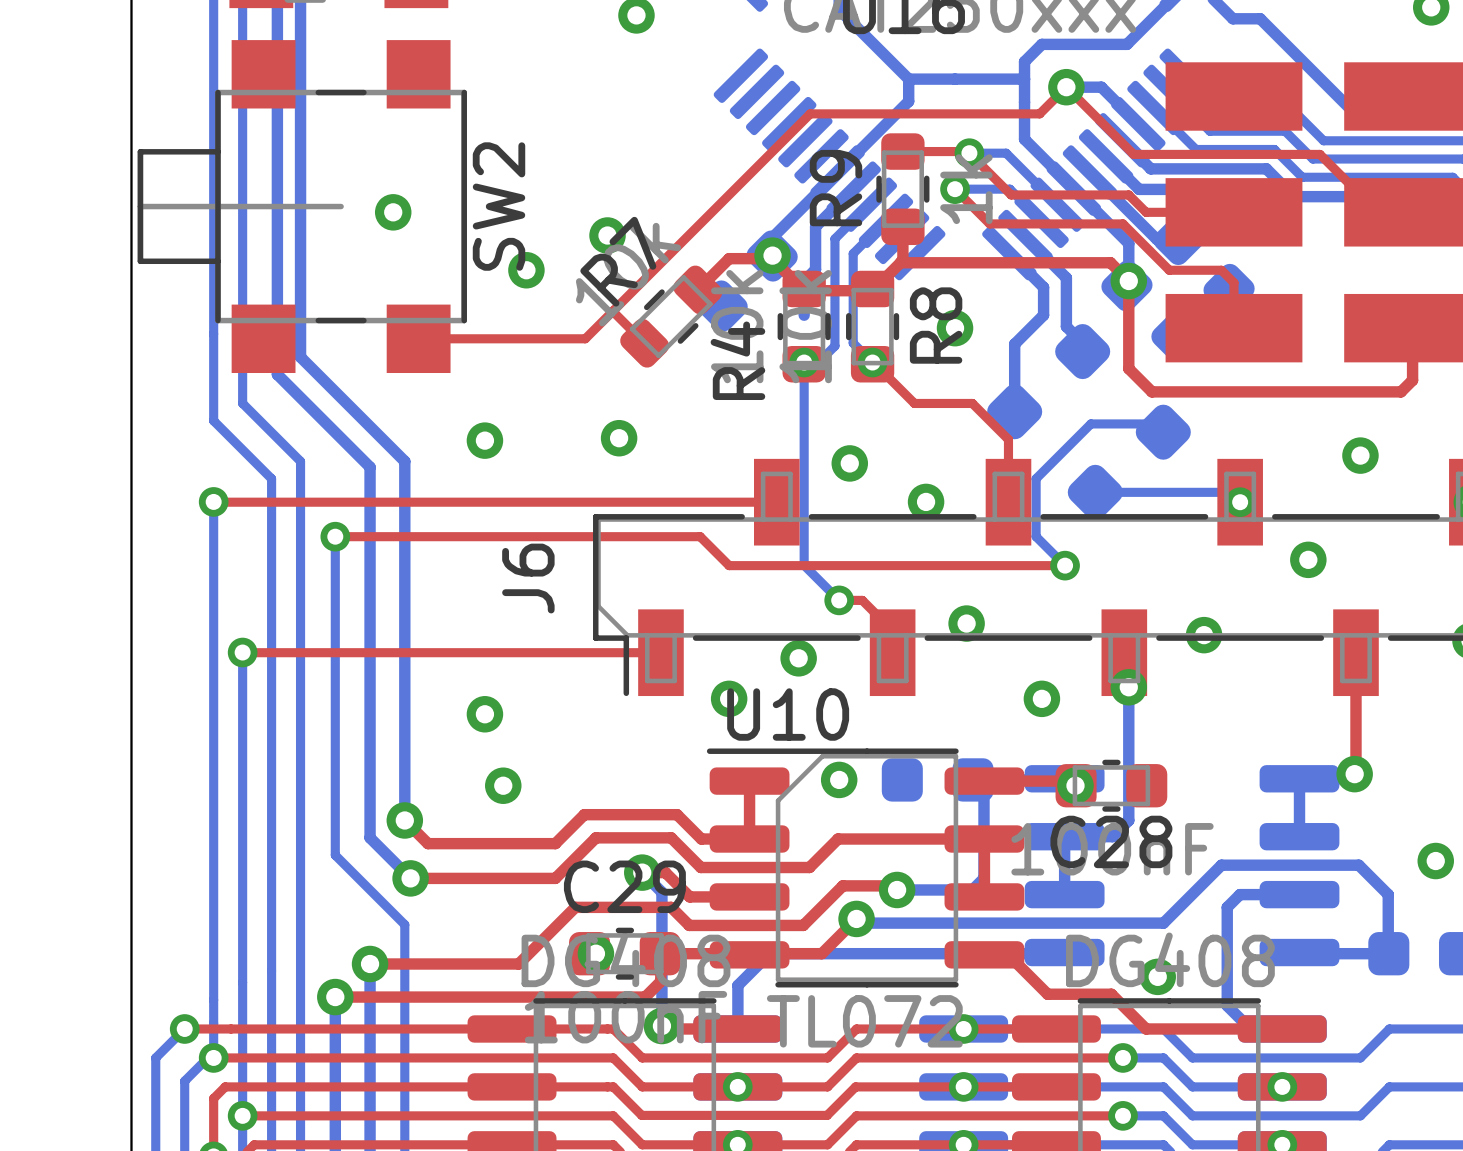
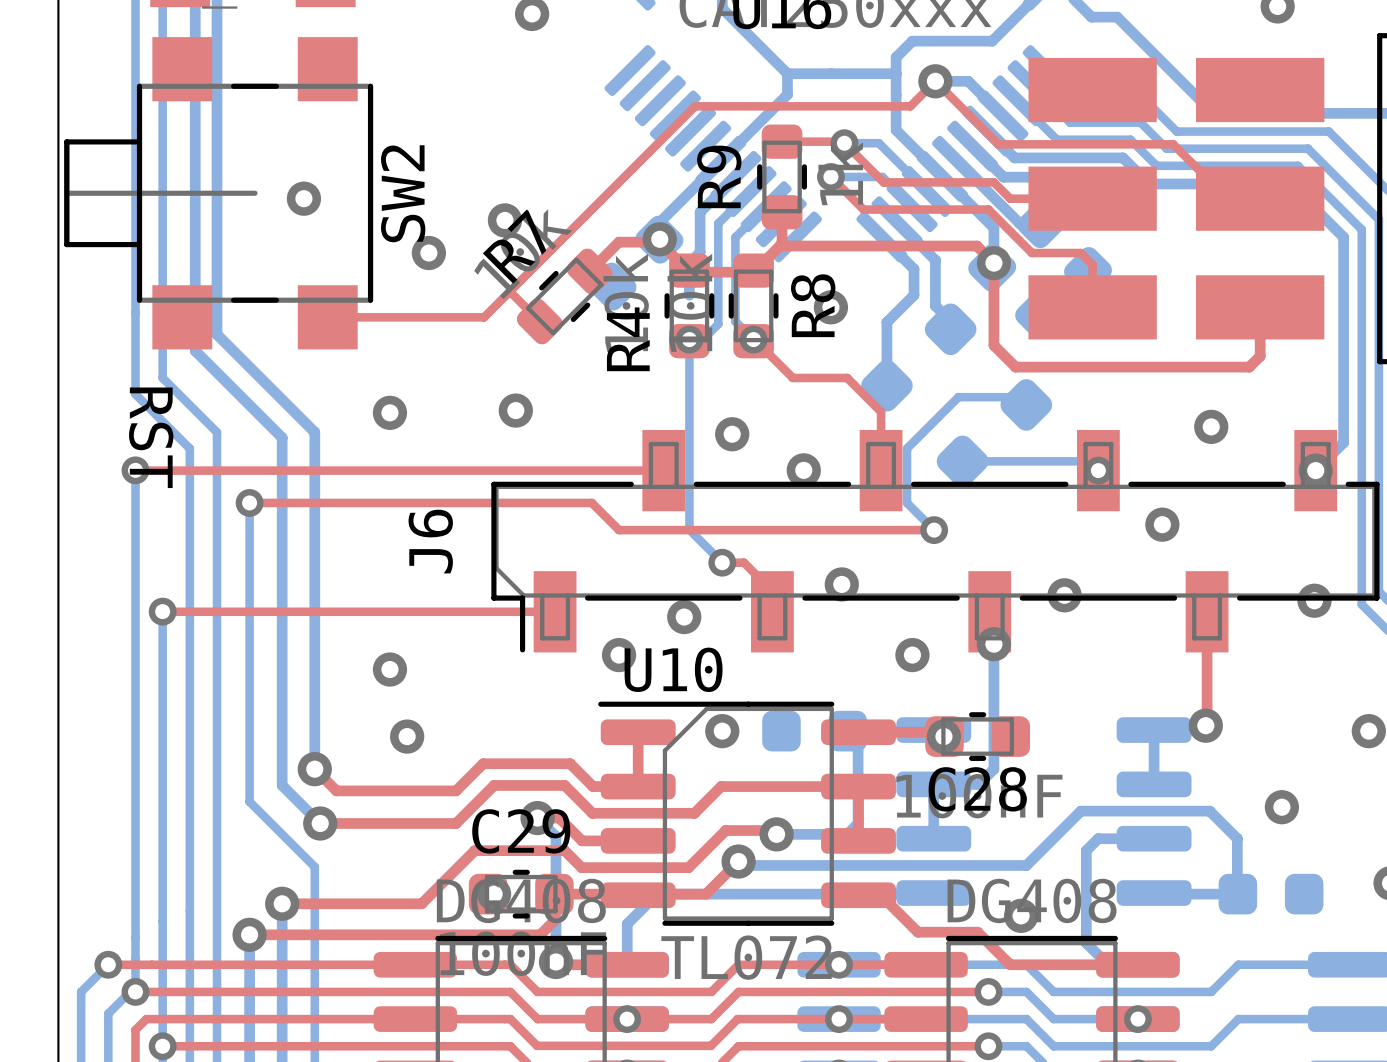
text: none -> RST (151, 437)

